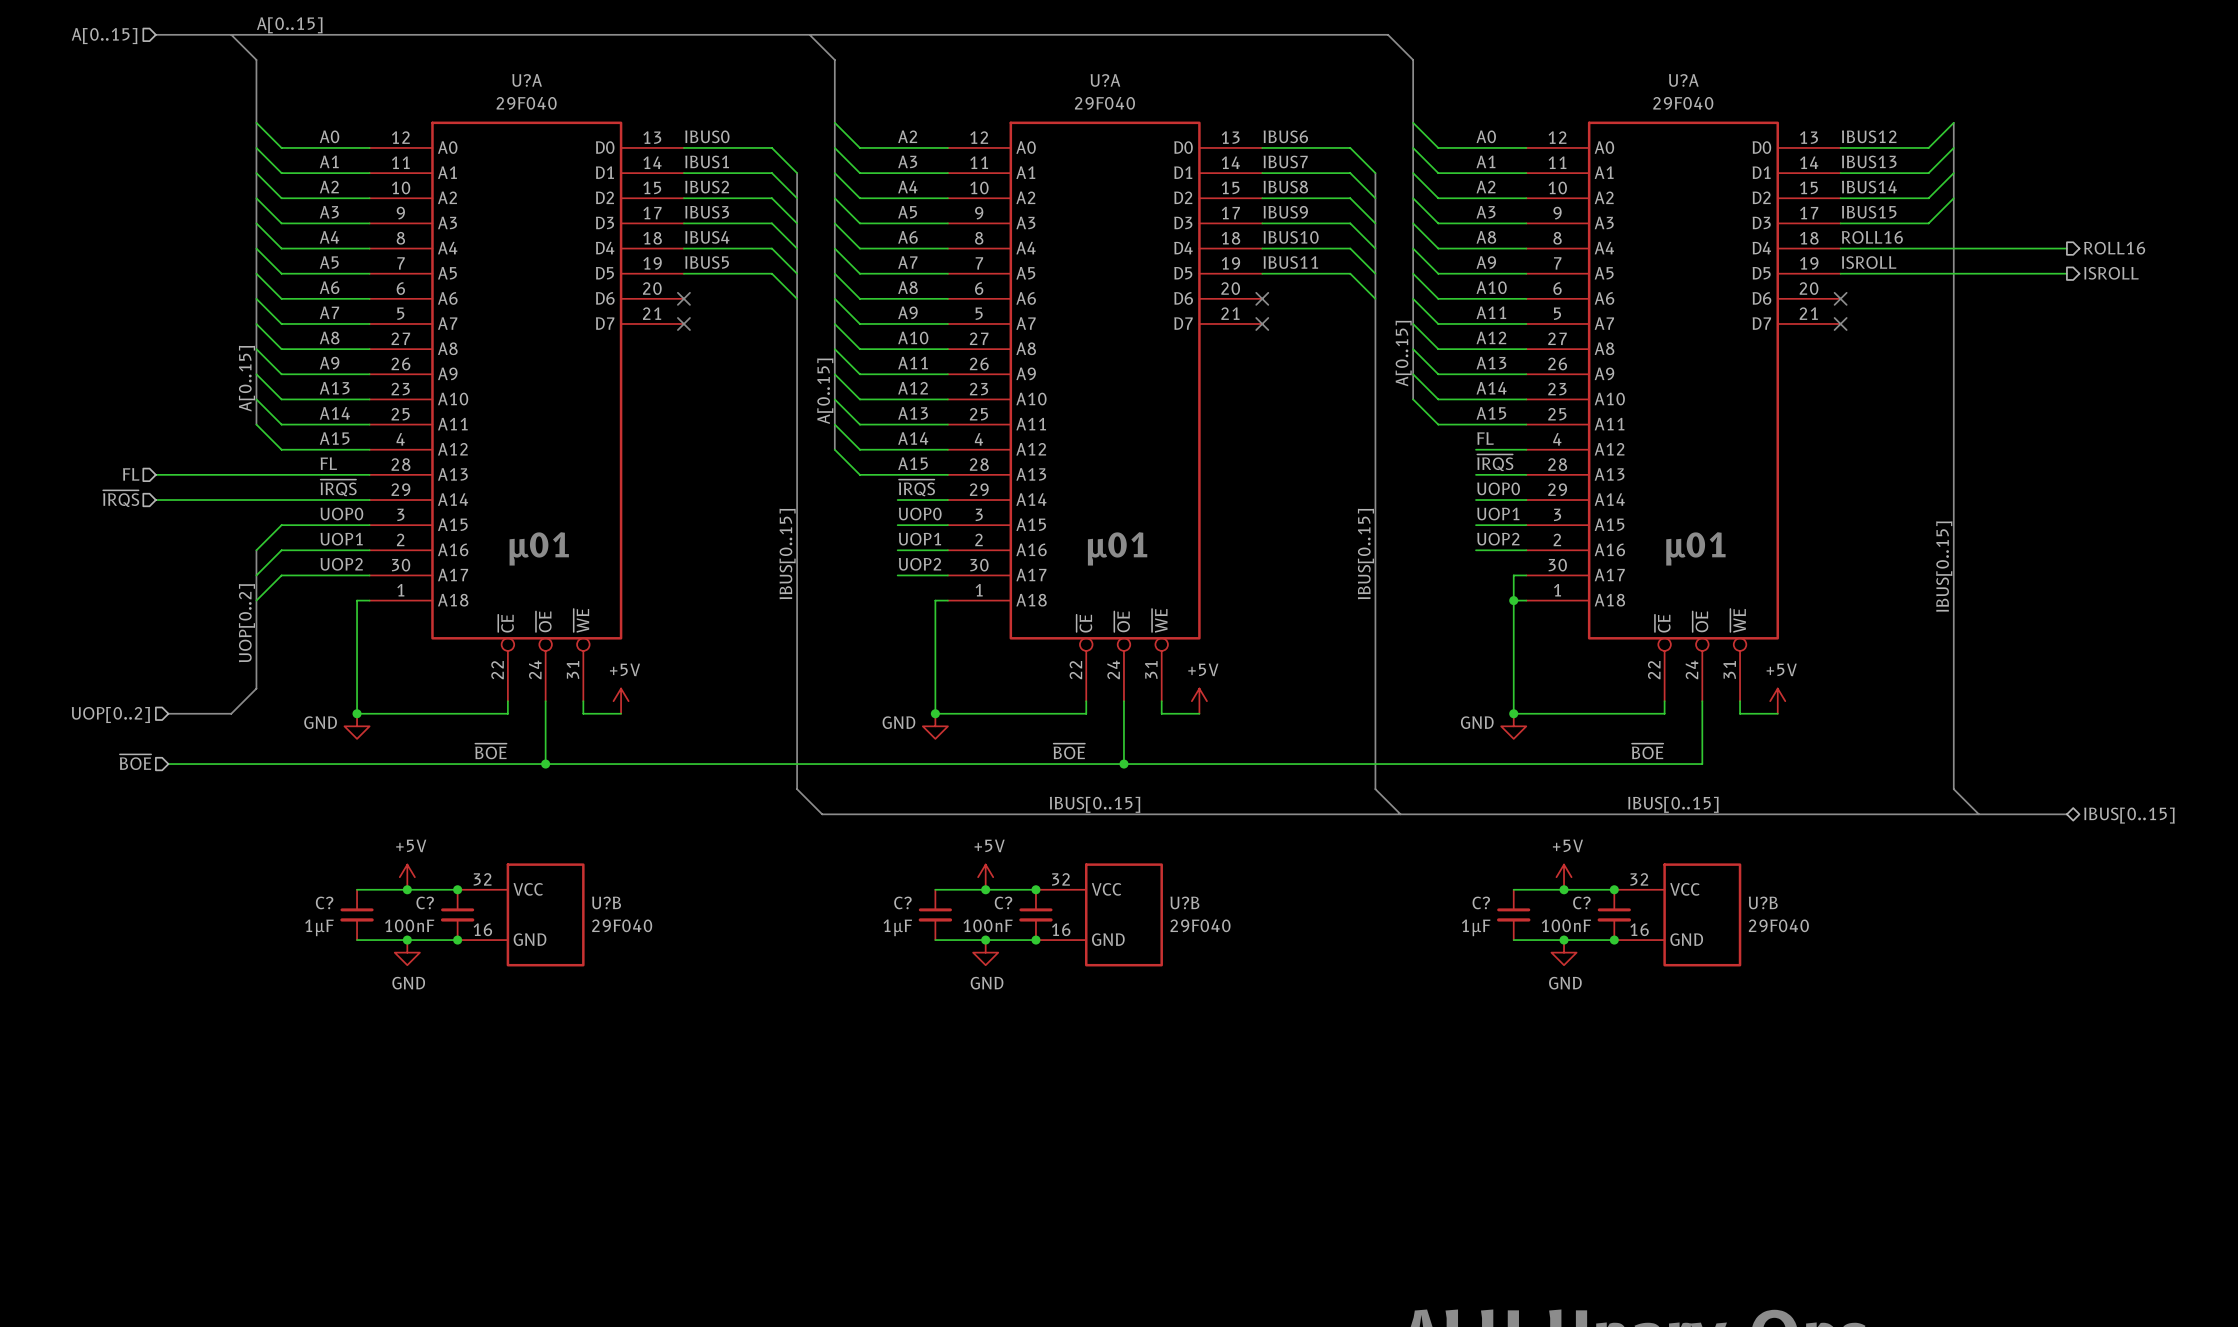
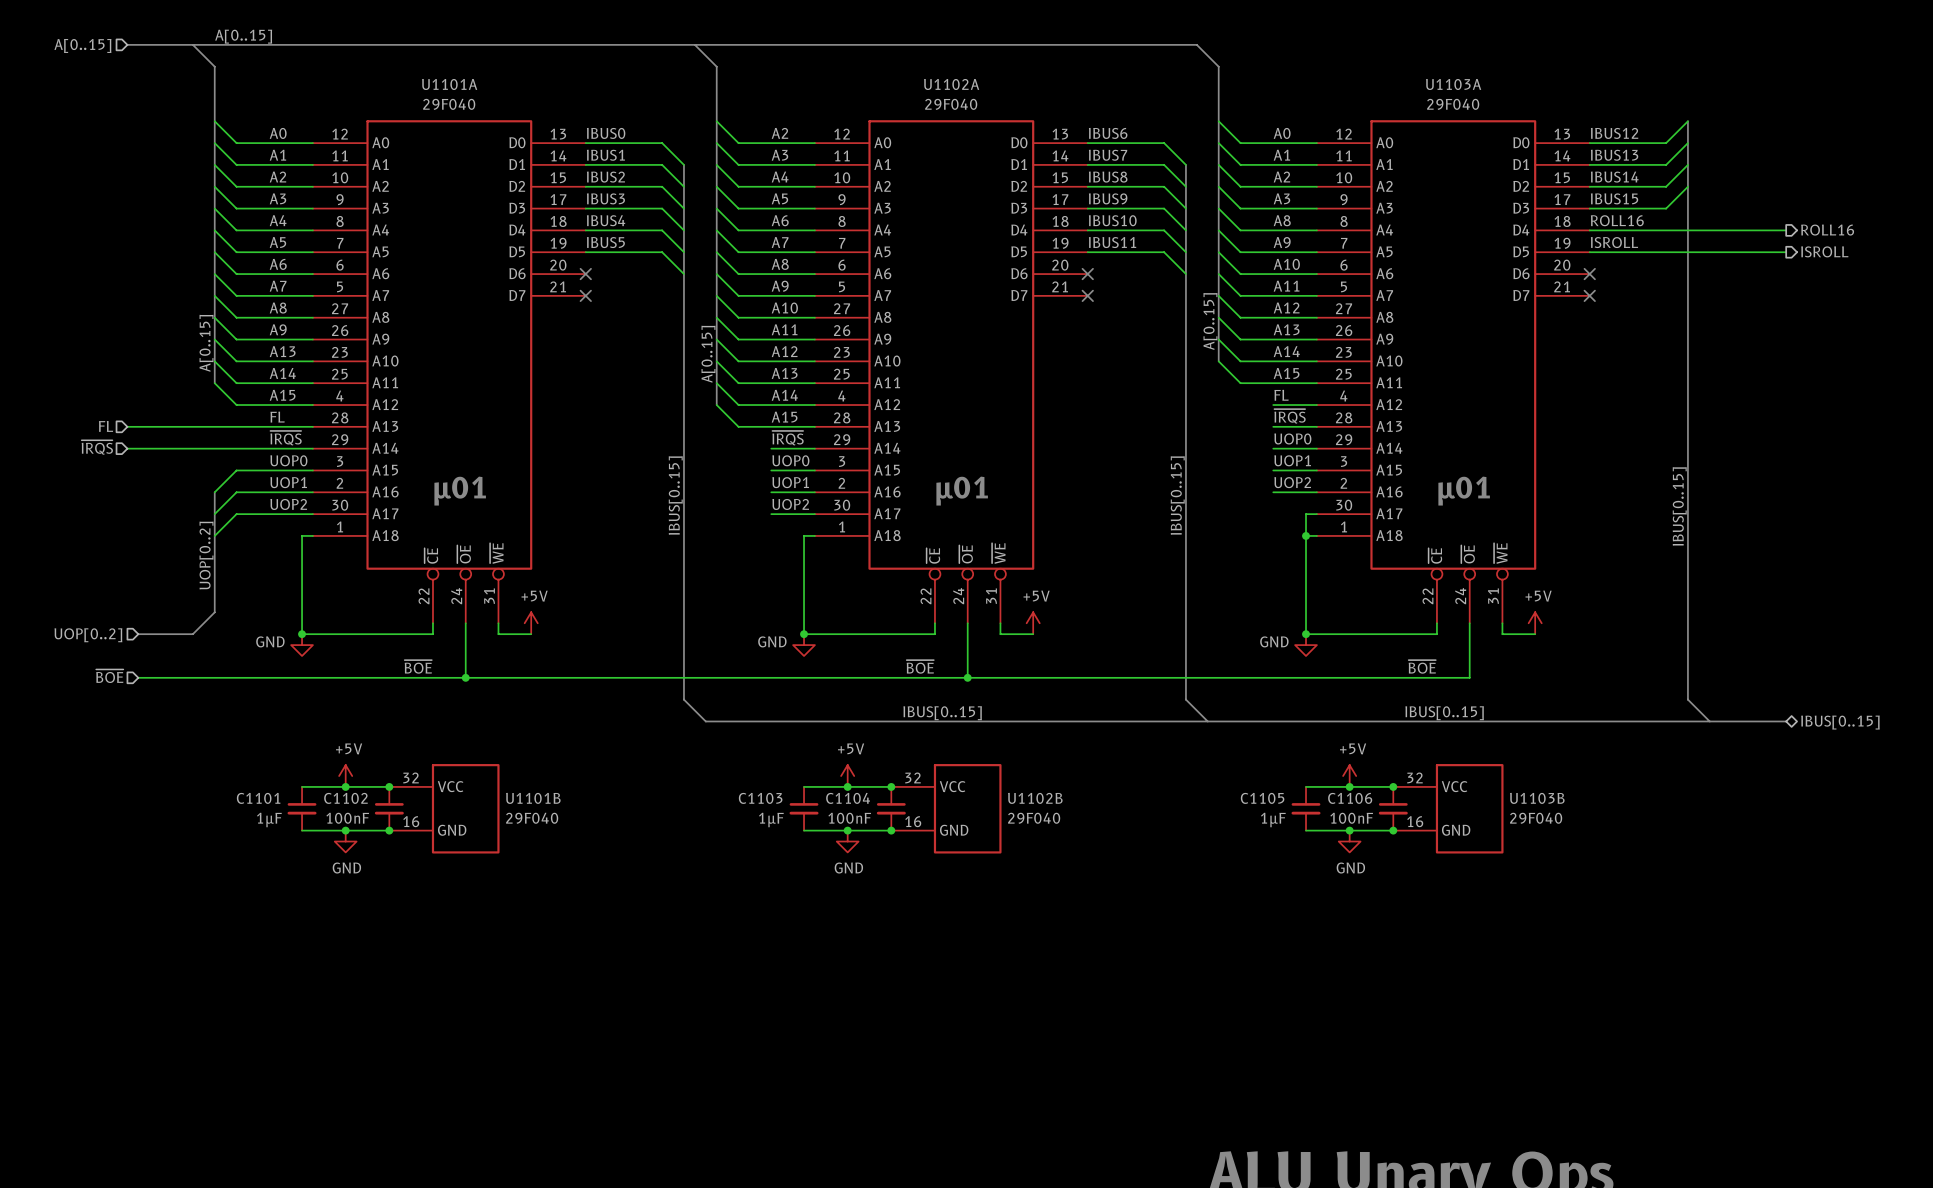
U?A name: U?A (527, 80) -> U1101A (449, 84)
U?A name: U?A (1105, 80) -> U1102A (951, 84)
U?A name: U?A (1683, 80) -> U1103A (1453, 84)
C? name: C? (324, 902) -> C1101 (258, 798)
C? name: C? (425, 902) -> C1102 (345, 798)
U?B name: U?B (606, 902) -> U1101B (533, 798)
C? name: C? (902, 902) -> C1103 (760, 798)
C? name: C? (1003, 902) -> C1104 (848, 798)
U?B name: U?B (1184, 902) -> U1102B (1035, 798)
C? name: C? (1481, 902) -> C1105 (1262, 798)
C? name: C? (1581, 902) -> C1106 (1350, 798)
U?B name: U?B (1763, 902) -> U1103B (1537, 798)

